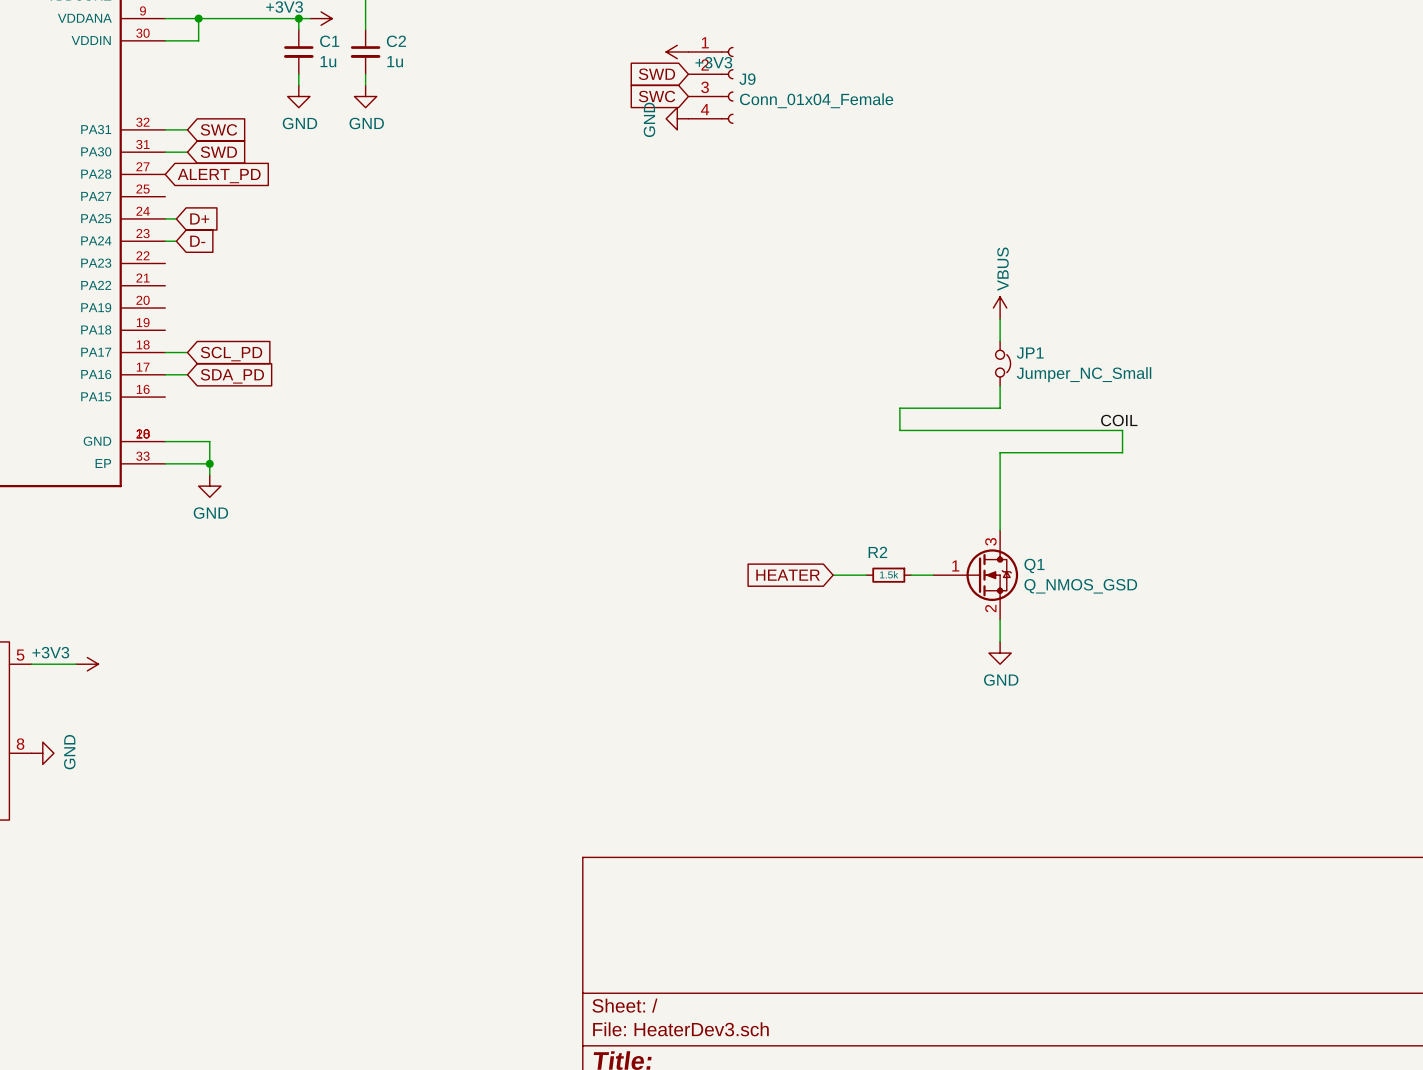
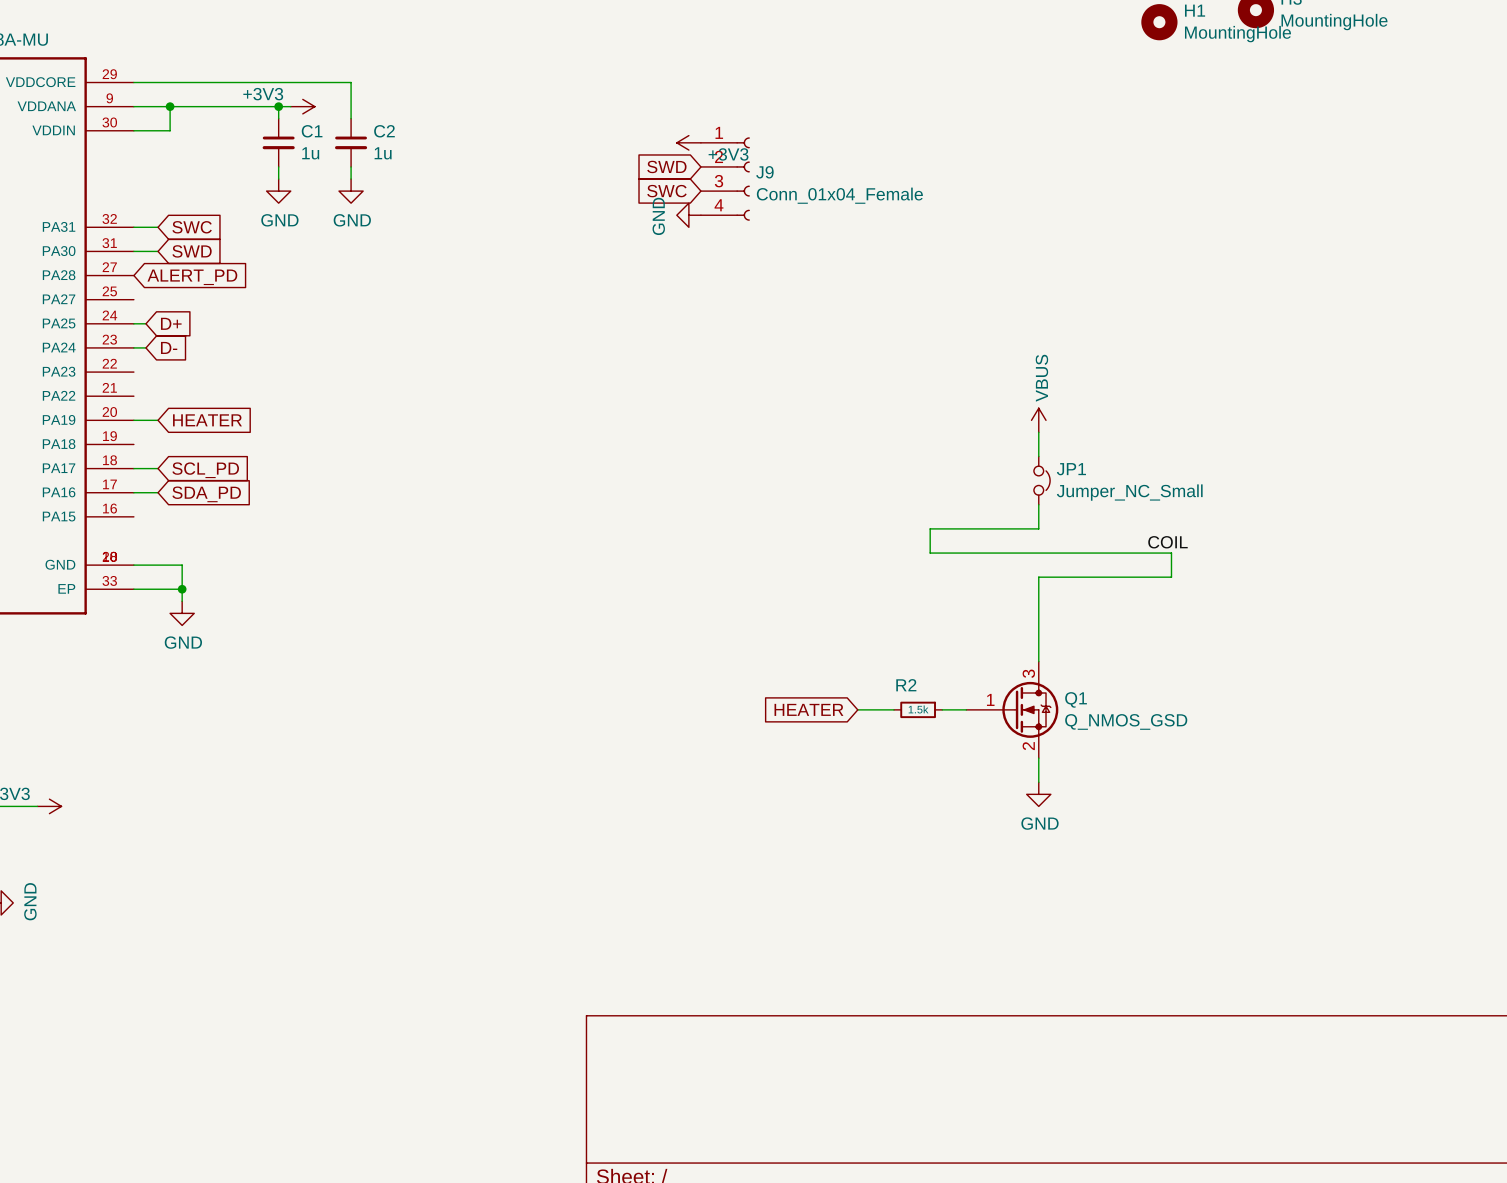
wire: none -> (133, 420) (158, 420)
global label: none -> HEATER (207, 420)

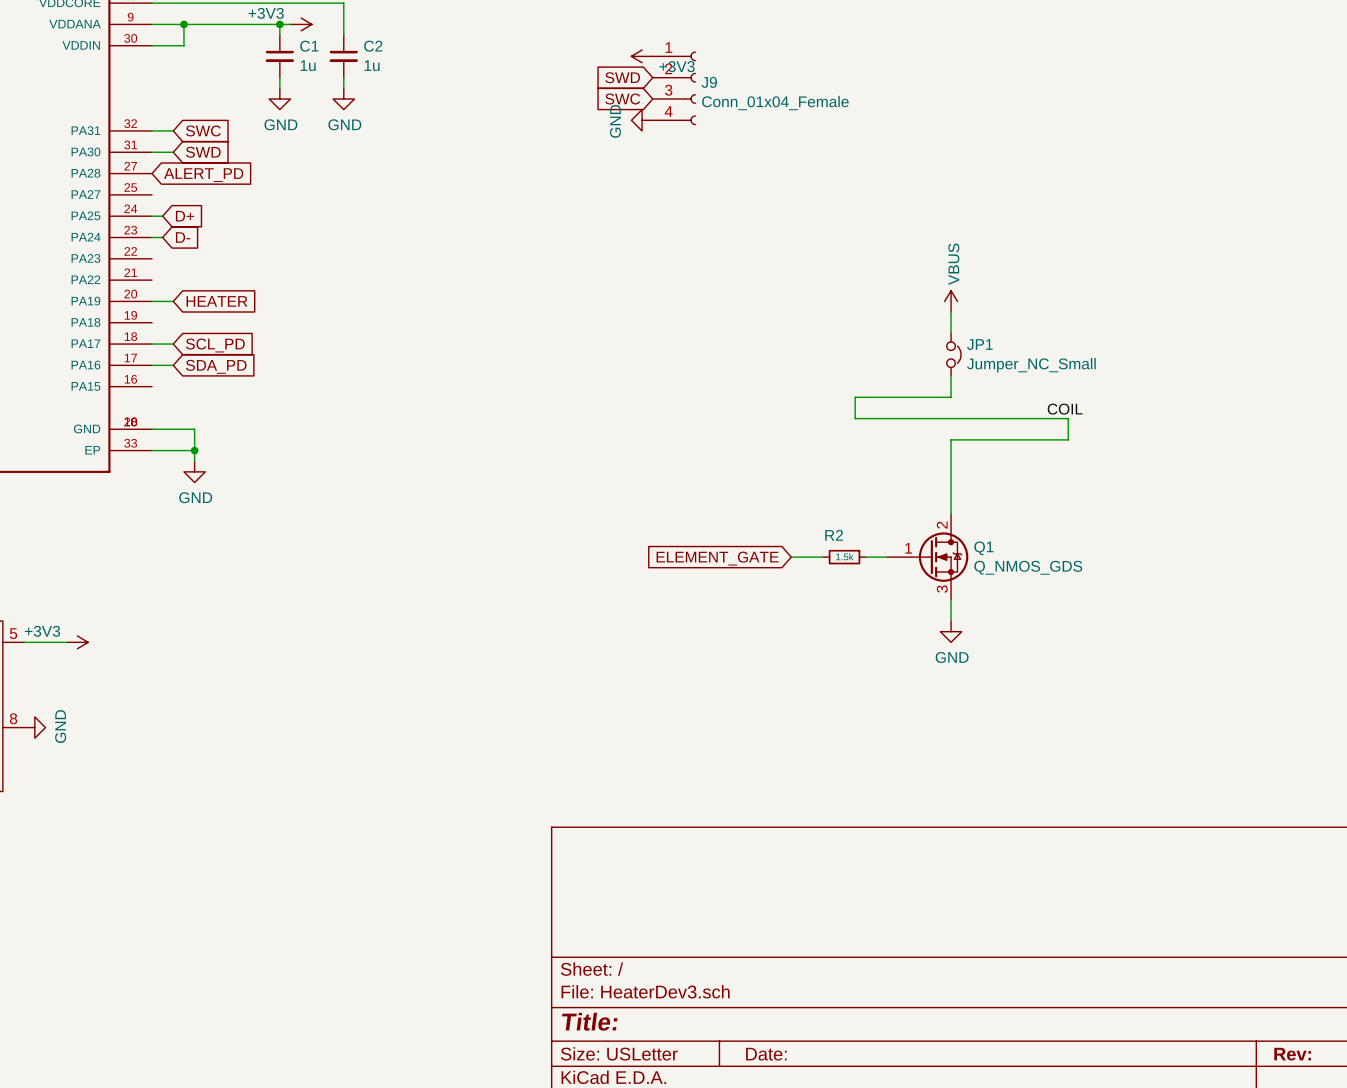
Q1 pin number: 3 (1028, 673) -> 2 (942, 525)
global label: HEATER (808, 709) -> ELEMENT_GATE (717, 558)
Q1 value: Q_NMOS_GSD (1126, 721) -> Q_NMOS_GDS (1028, 567)
Q1 pin number: 2 (1028, 746) -> 3 (942, 589)

